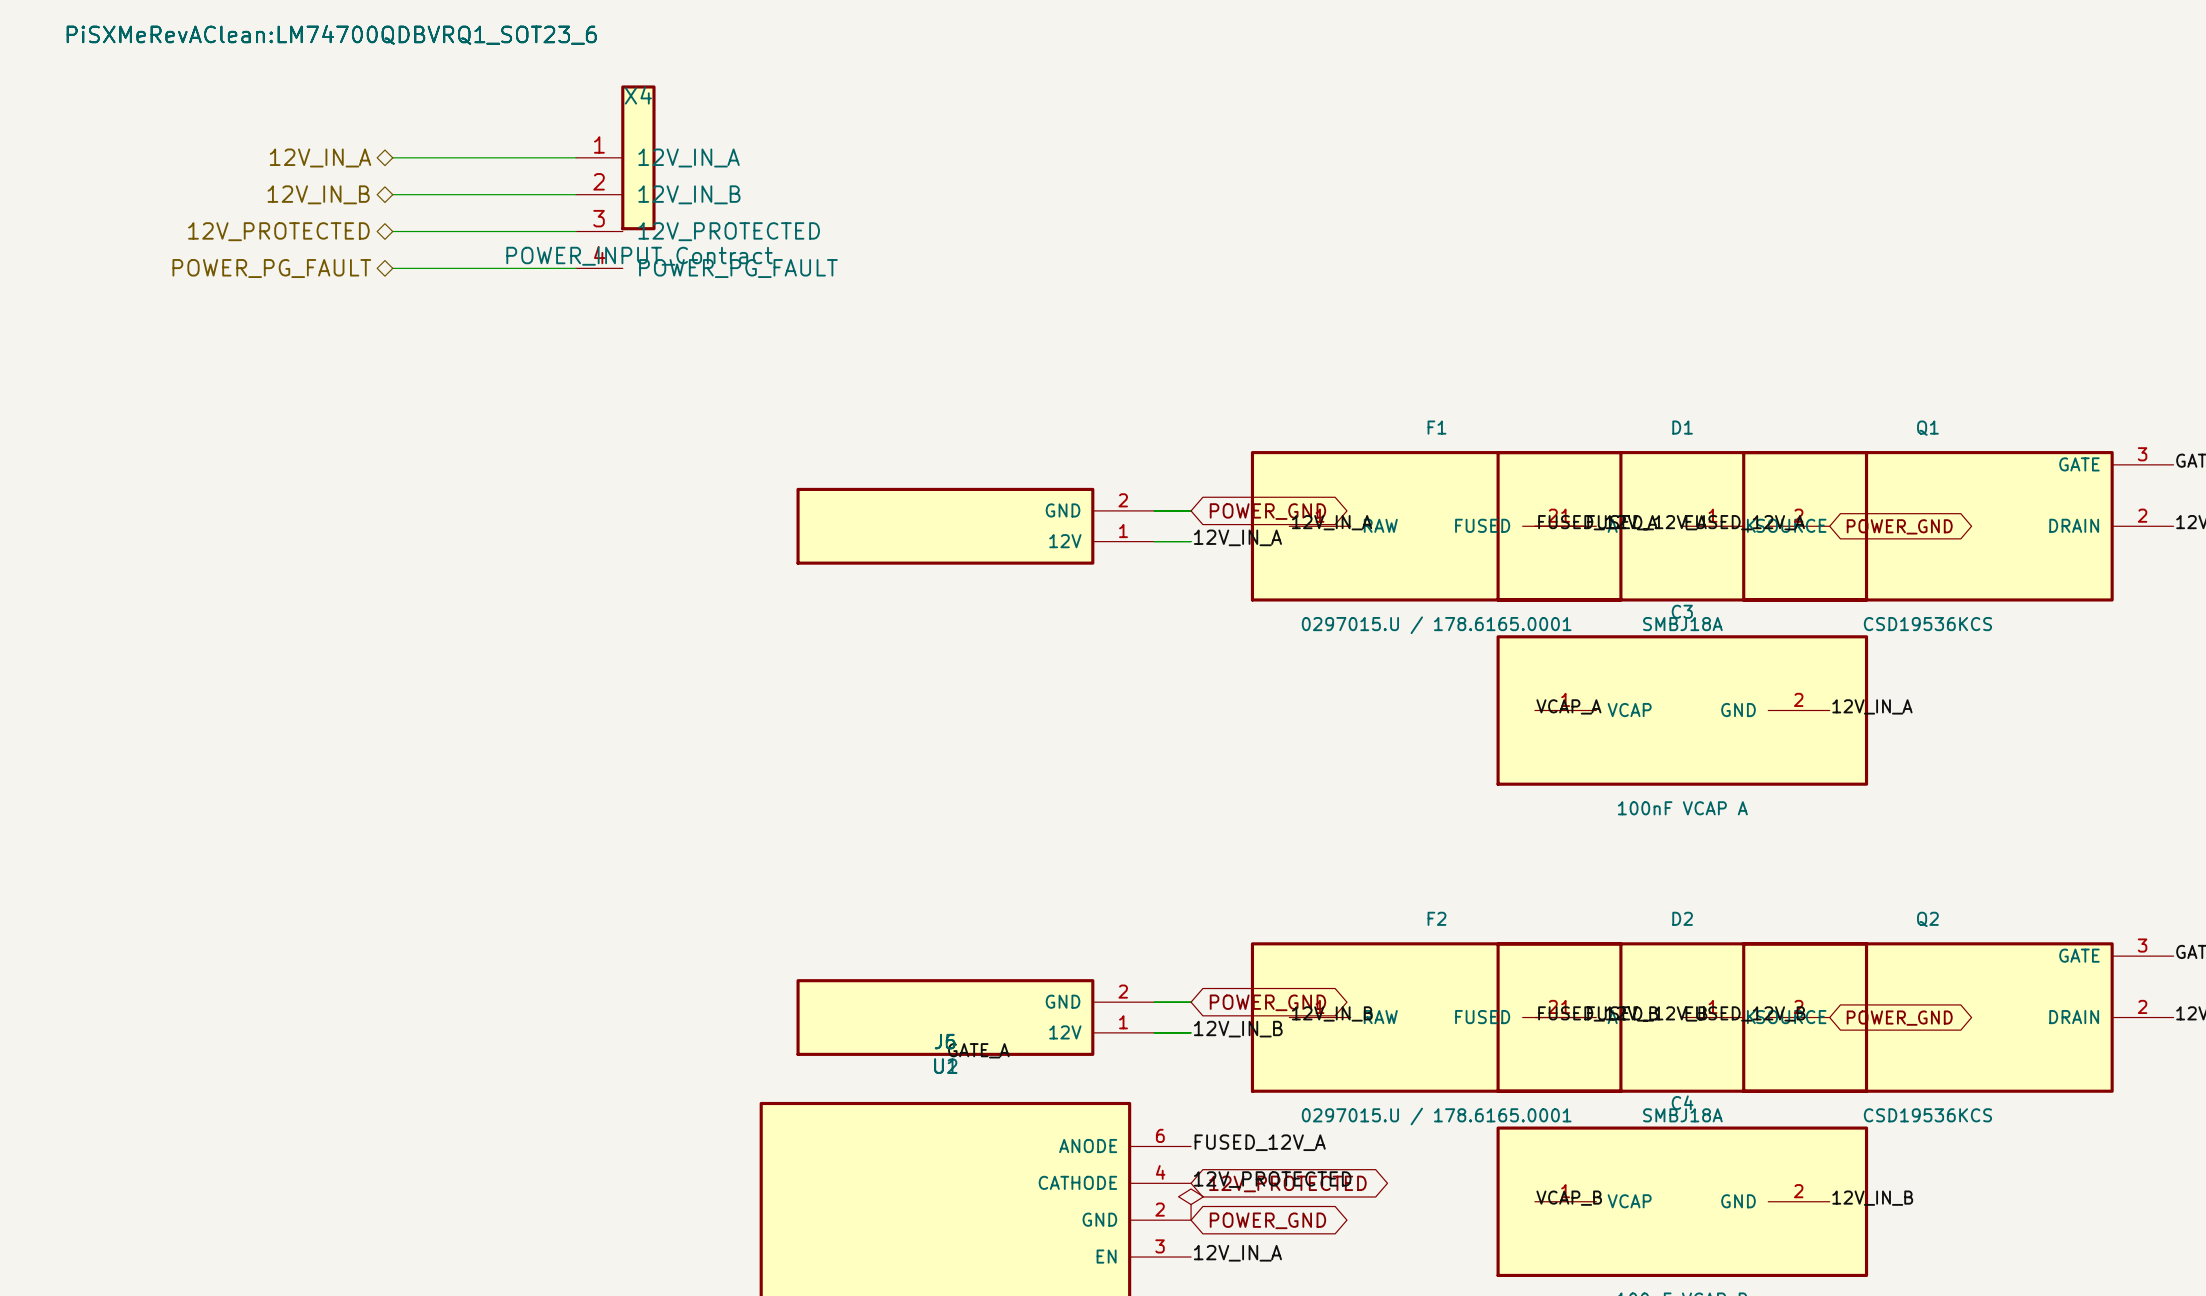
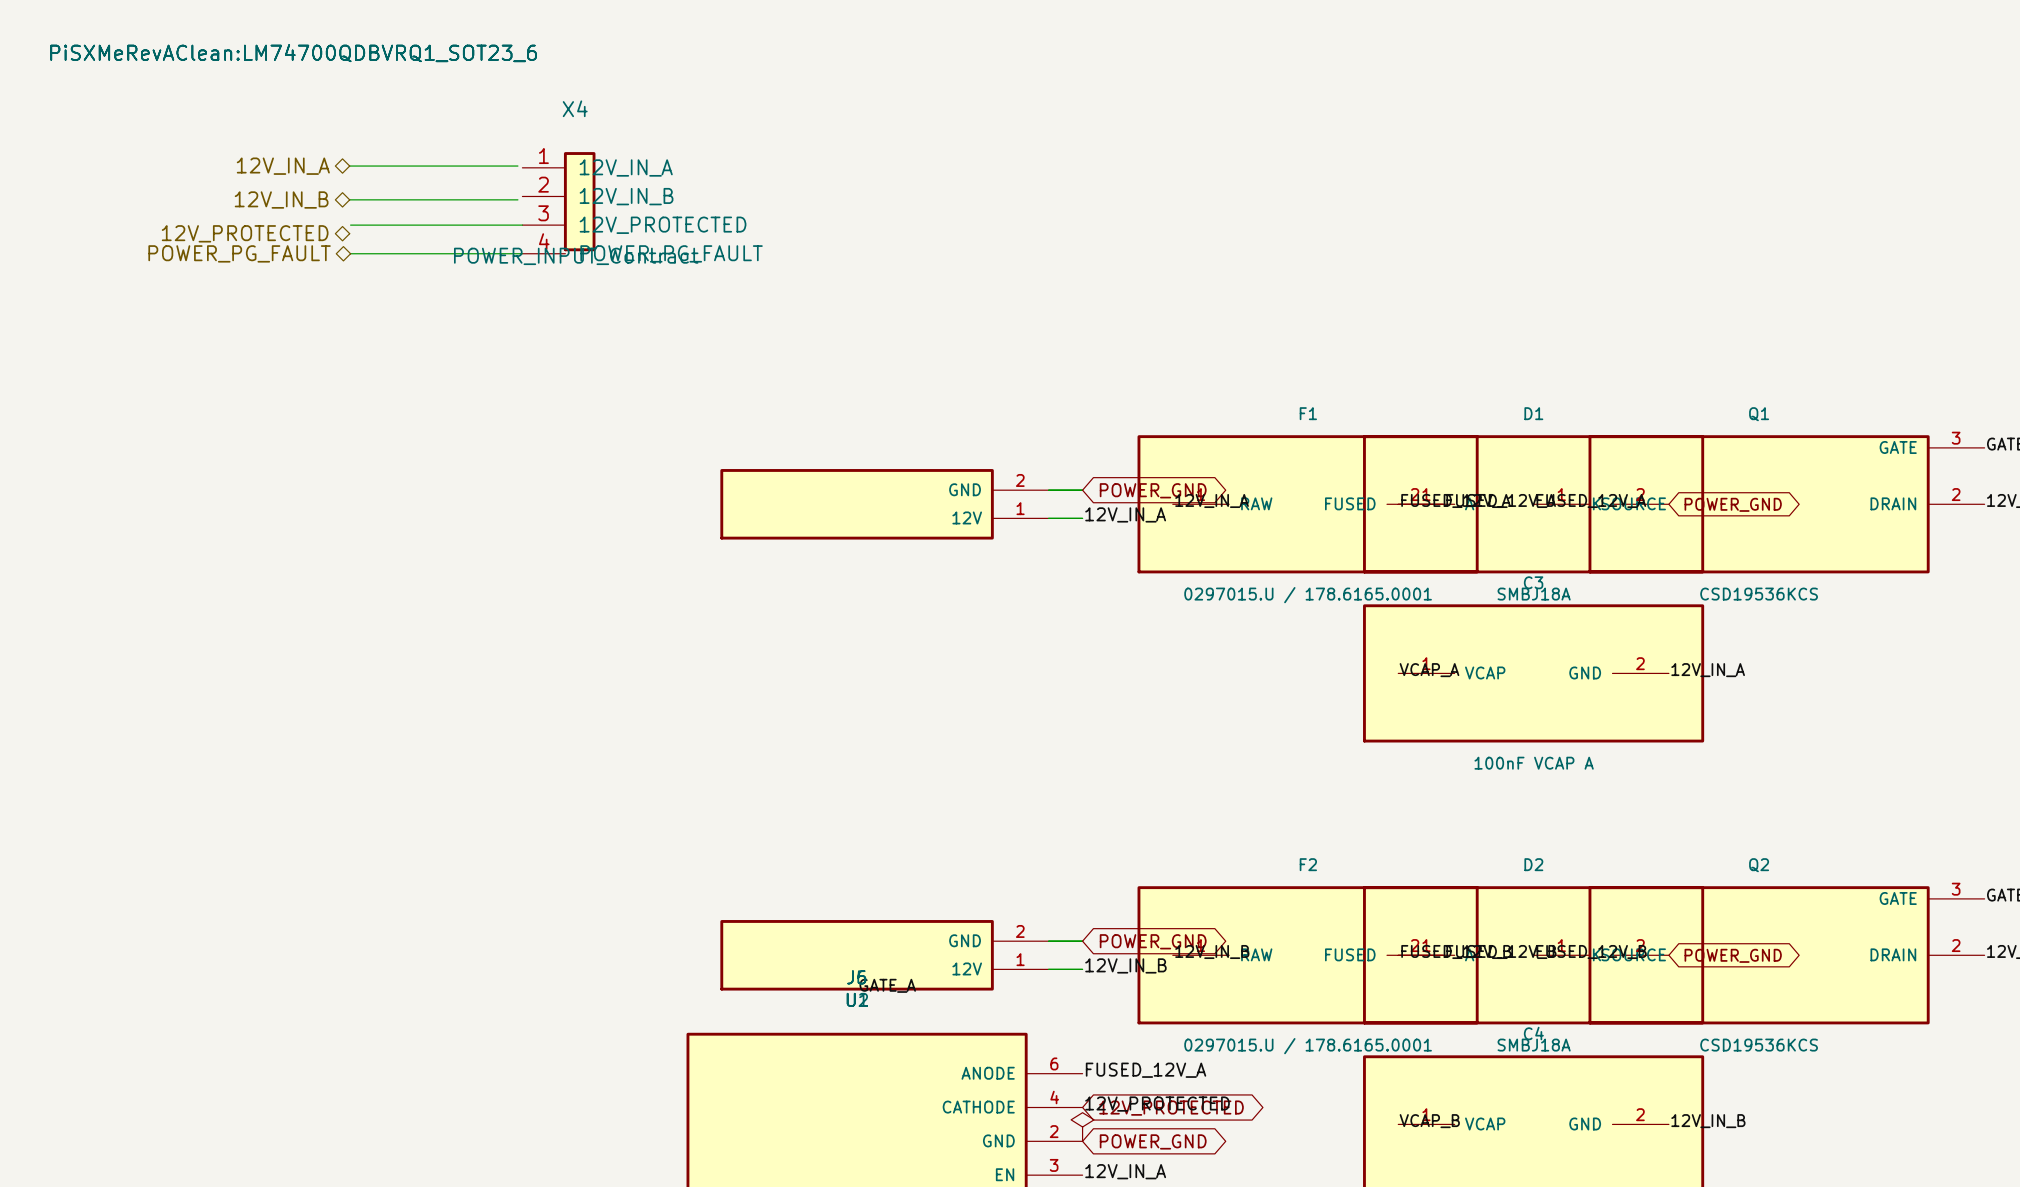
X4 symbol: [576, 85, 656, 269] -> [522, 152, 596, 254]
wire: none -> (350, 225) (522, 225)
wire: (392, 231) (576, 231) -> none
wire: none -> (350, 253) (522, 253)
hierarchical label position: POWER_PG_FAULT (271, 268) -> POWER_PG_FAULT (239, 253)
wire: (392, 268) (576, 268) -> none

